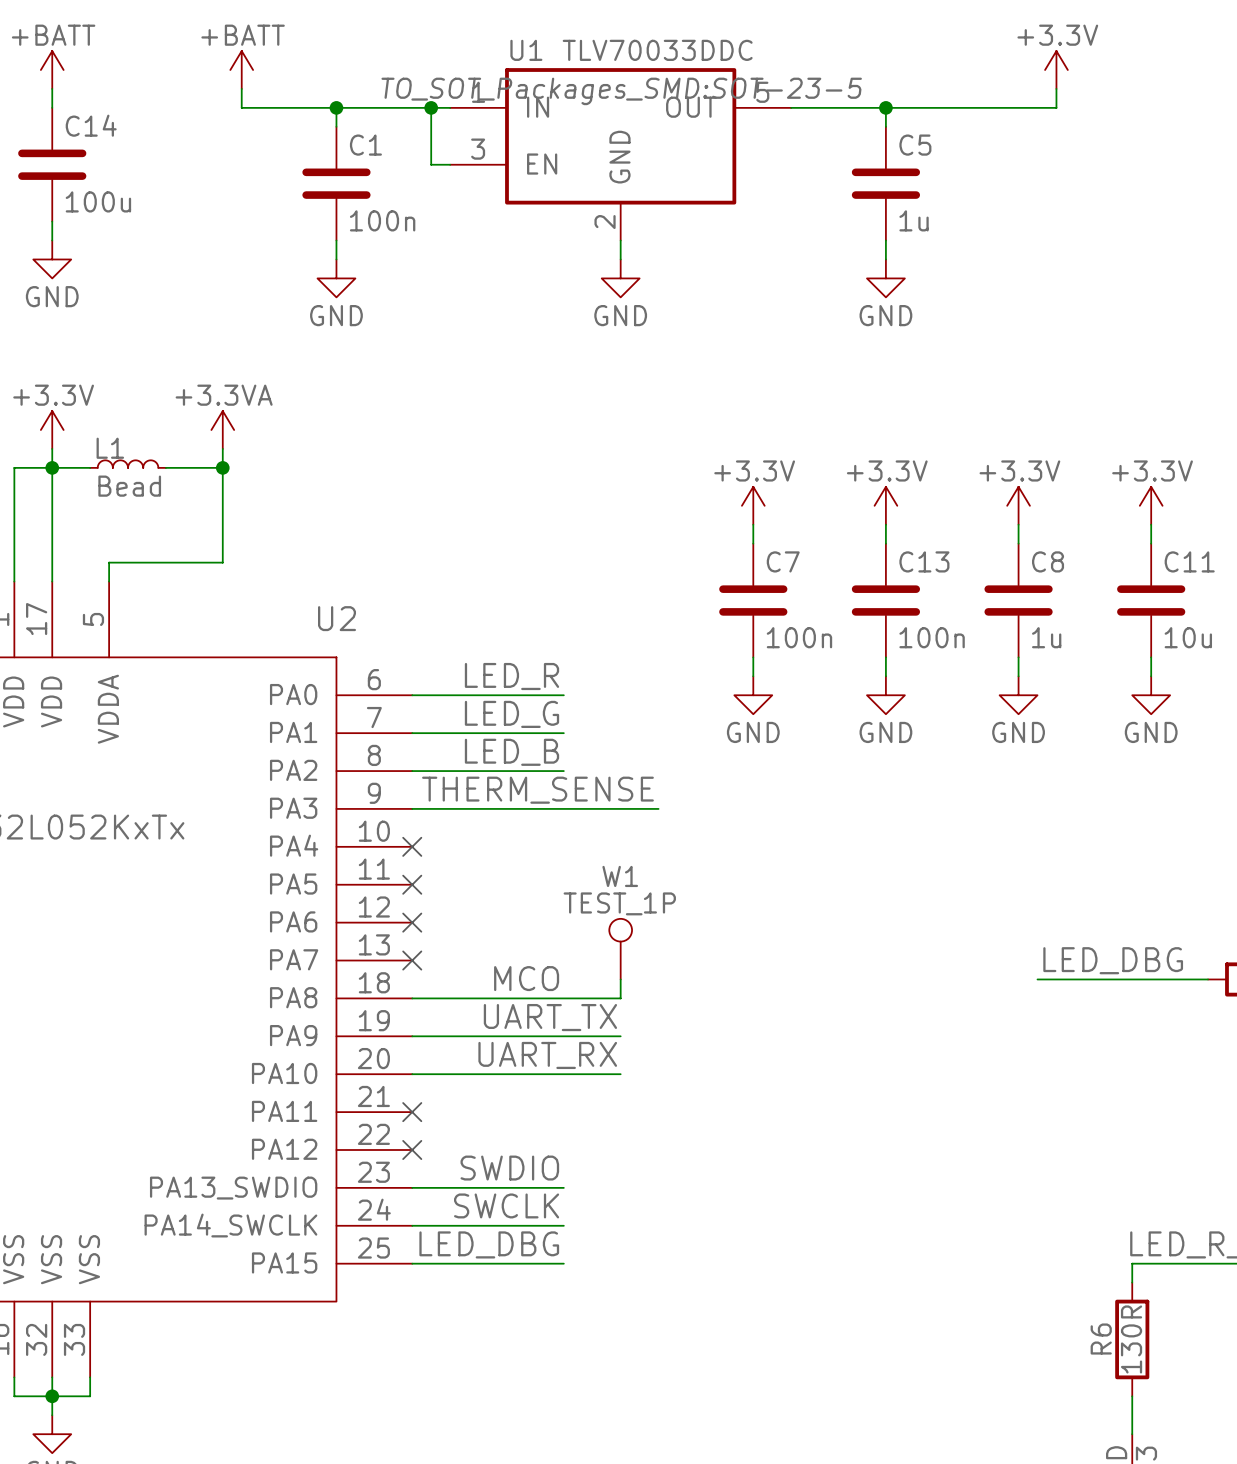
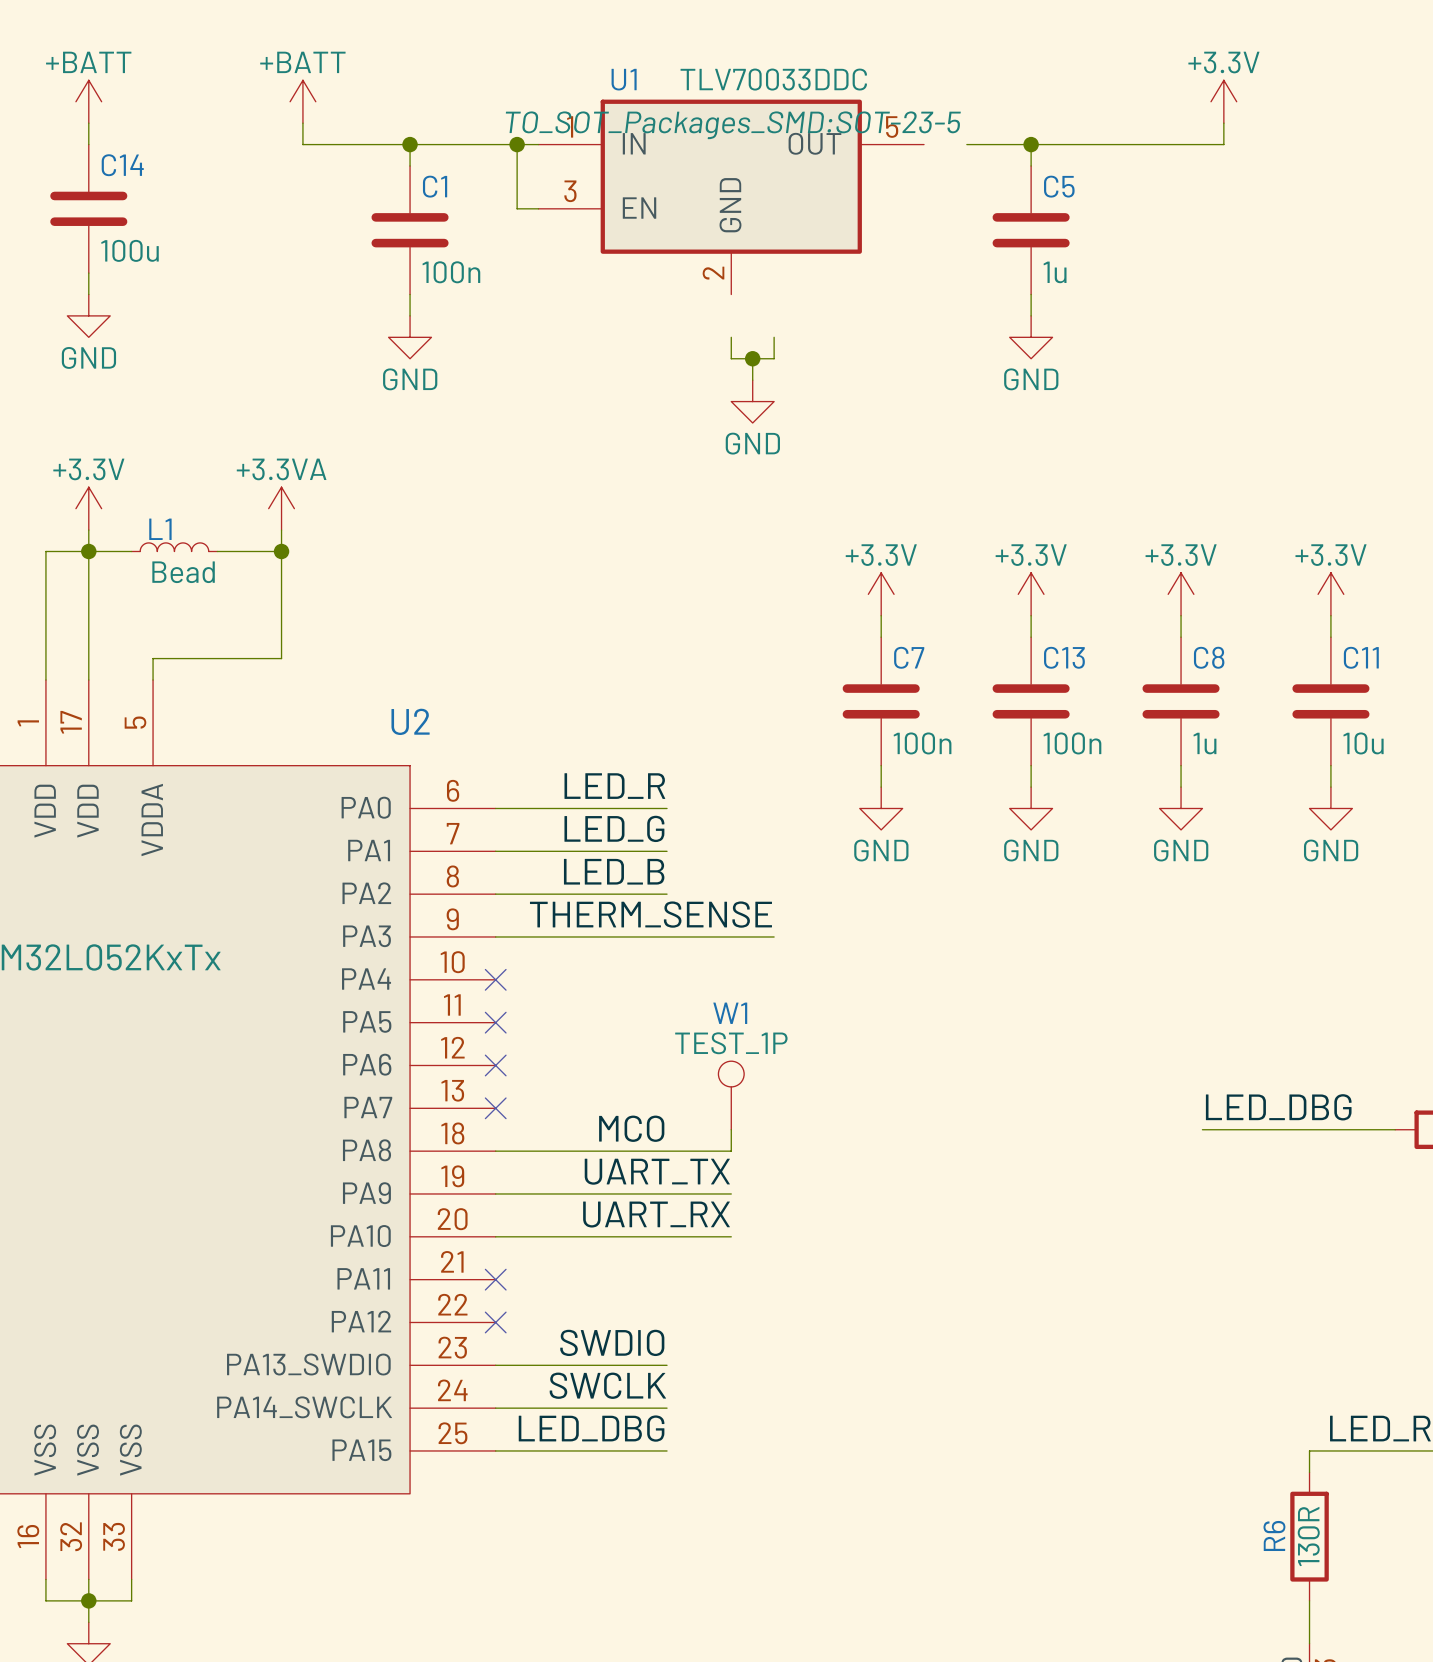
wire: (791, 107) (829, 107) -> none
wire: (620, 240) (620, 259) -> (752, 358) (752, 380)
wire: none -> (731, 337) (731, 358) (774, 358) (774, 337)
power symbol position: GND (620, 278) -> GND (752, 401)
junction: none -> (752, 358)

